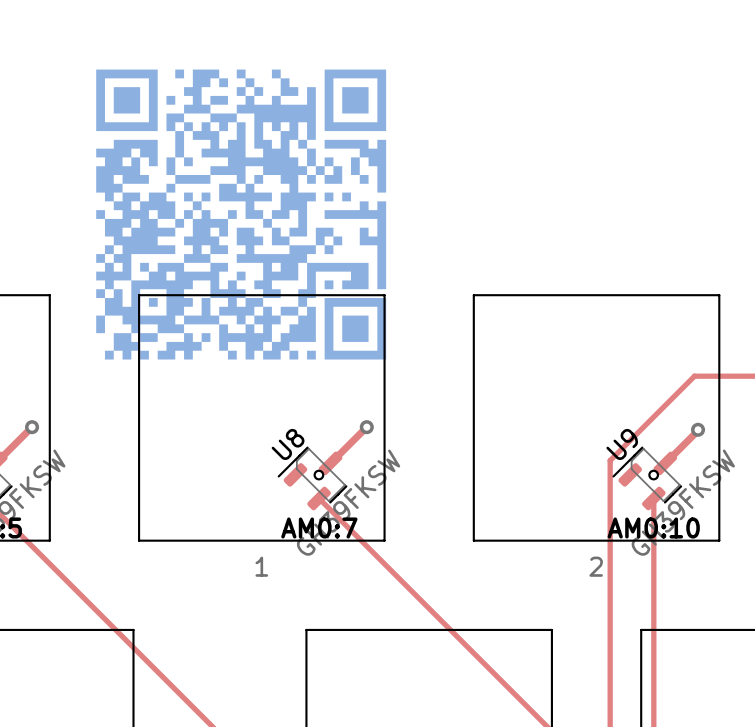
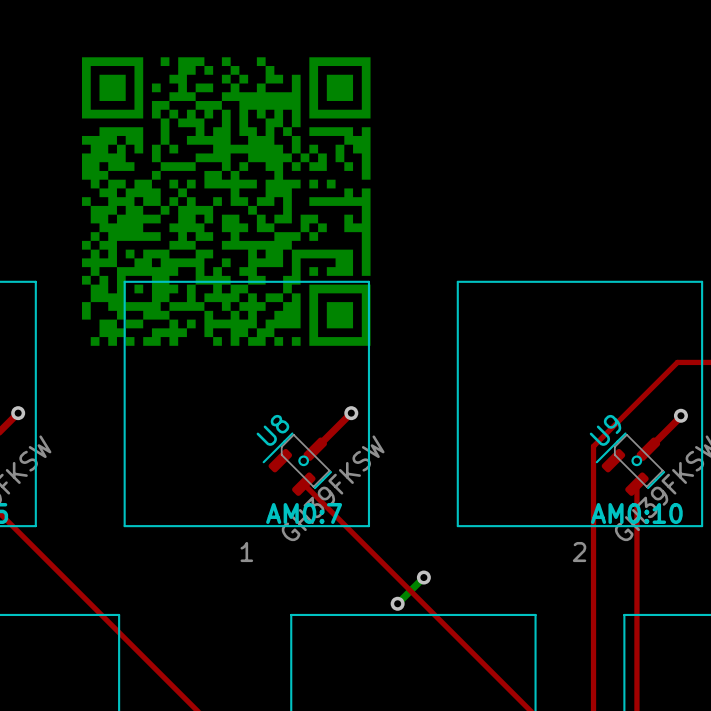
bottom track: none -> (423, 577) (397, 603)
via: none -> (423, 577)
via: none -> (397, 603)

